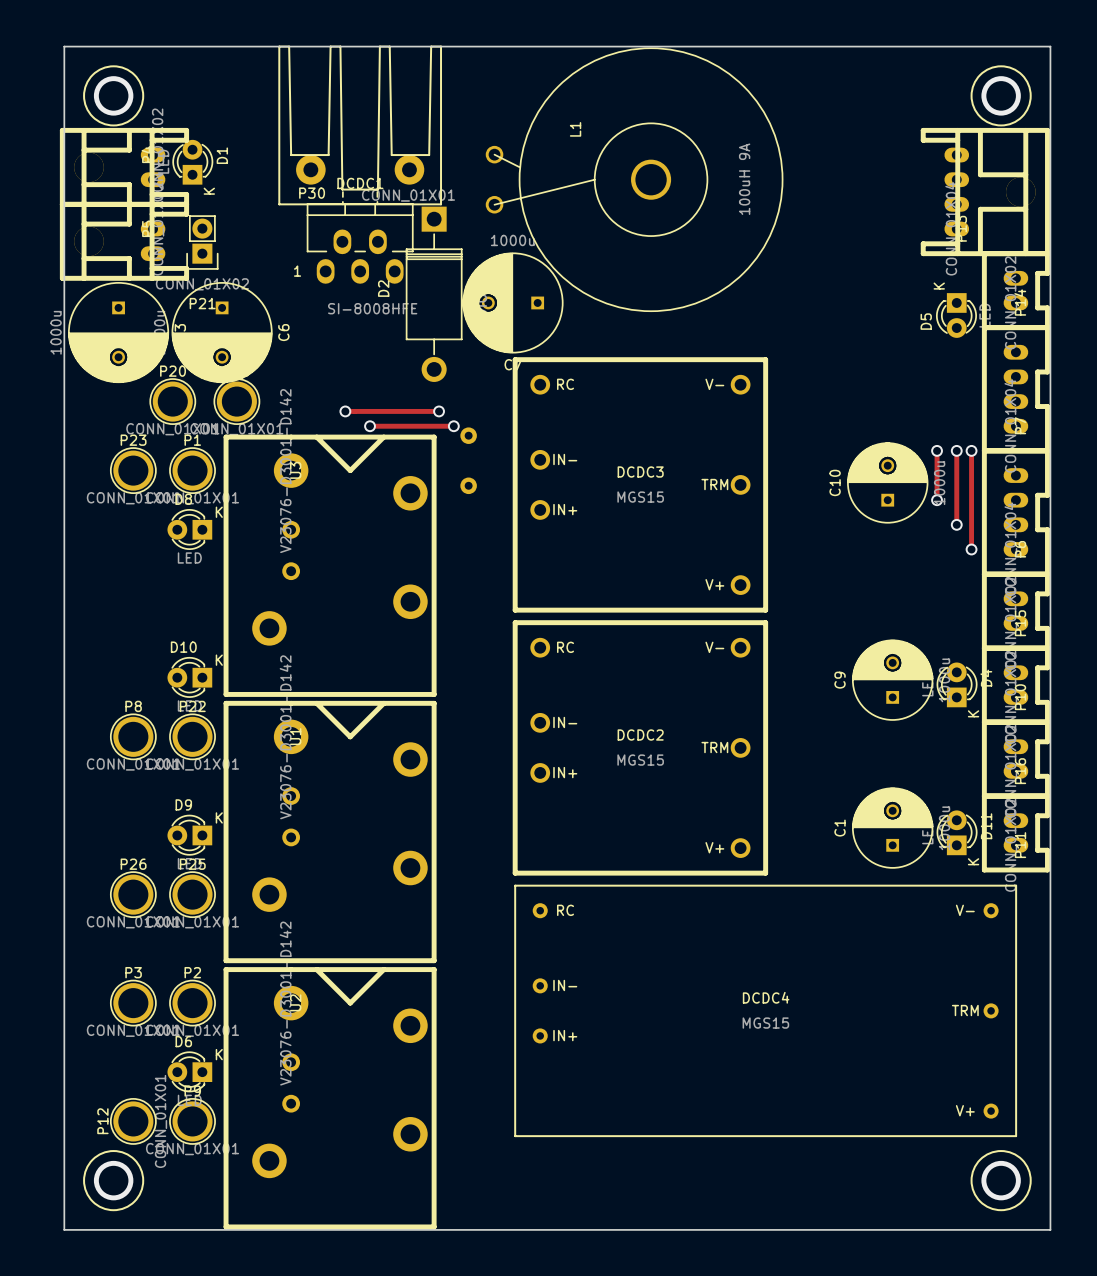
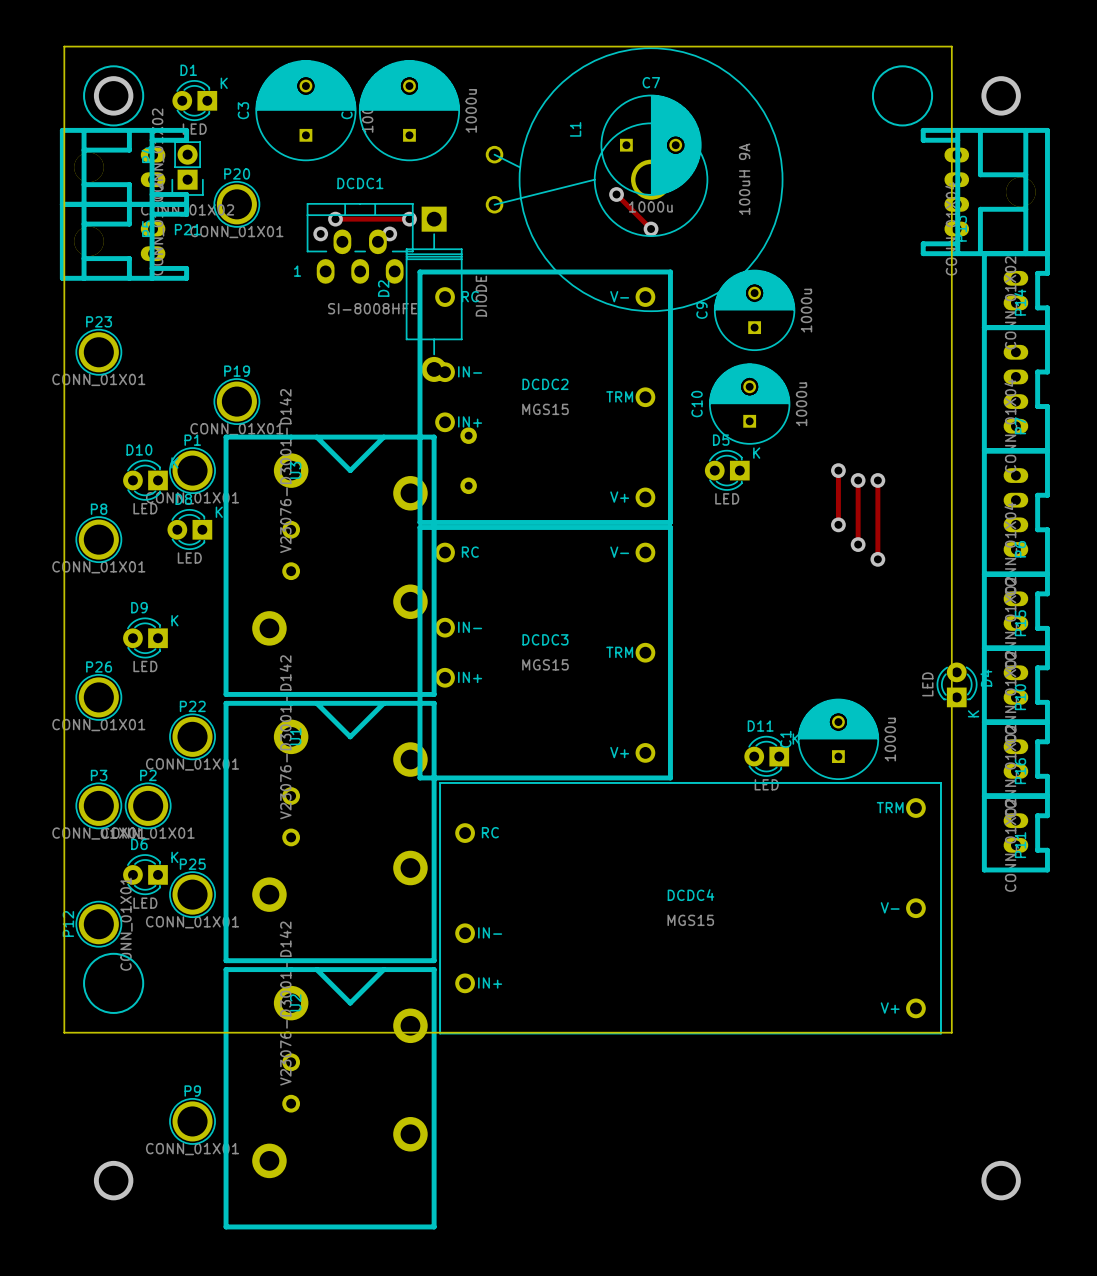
board edge: (951, 46) (1050, 46) (1050, 1229) (64, 1229) (64, 1032) -> (951, 46) (951, 1032) (64, 1032)
drawing position: (1001, 95) -> (902, 95)
P30: CONN_01X01 (360, 125) -> none
D1 rotation: 0° (192, 162) -> 90° counterclockwise (194, 100)
D1 position: (192, 162) -> (194, 100)
track: none -> (616, 194) (651, 229)
via: none -> (616, 194)
track: none -> (335, 219) (409, 219)
via: none -> (335, 219)
via: none -> (409, 219)
via: none -> (651, 229)
via: none -> (320, 233)
via: none -> (389, 233)
P21 position: (202, 242) -> (187, 168)
C7 rotation: 0° (513, 302) -> 180° (651, 145)
C7 position: (513, 302) -> (651, 145)
D5 rotation: 0° (956, 315) -> 90° clockwise (727, 470)
D5 position: (956, 315) -> (727, 470)
C3 rotation: 0° (118, 332) -> 180° (305, 110)
C3 position: (118, 332) -> (305, 110)
C6 rotation: 0° (222, 332) -> 180° (409, 110)
C6 position: (222, 332) -> (409, 110)
P20 position: (172, 401) -> (236, 204)
track: (345, 411) (439, 411) -> none
via: (345, 411) -> none
via: (439, 411) -> none
track: (370, 426) (453, 426) -> none
via: (370, 426) -> none
via: (453, 426) -> none
track: (937, 450) (937, 500) -> none
via: (937, 450) -> none
track: (956, 450) (956, 524) -> none
via: (956, 450) -> none
track: (971, 450) (971, 549) -> none
via: (971, 450) -> none
P23 position: (133, 470) -> (98, 352)
track: none -> (838, 470) (838, 524)
via: none -> (838, 470)
track: none -> (858, 480) (858, 544)
via: none -> (858, 480)
track: none -> (877, 480) (877, 559)
via: none -> (877, 480)
C10 position: (887, 482) -> (749, 404)
DCDC3 position: (640, 484) -> (545, 652)
via: (937, 500) -> none
via: none -> (838, 524)
via: (956, 524) -> none
via: none -> (858, 544)
via: (971, 549) -> none
via: none -> (877, 559)
D10 position: (189, 677) -> (145, 480)
C9 position: (892, 680) -> (754, 310)
P8 position: (133, 736) -> (98, 539)
DCDC2 position: (640, 747) -> (545, 397)
C1 position: (892, 828) -> (838, 739)
D11 rotation: 0° (957, 832) -> 90° counterclockwise (766, 756)
D11 position: (957, 832) -> (766, 756)
D9 position: (189, 835) -> (145, 637)
DCDC4 footprint: [514, 884, 1018, 1138] -> [439, 781, 942, 1035]
P26 position: (133, 894) -> (98, 697)
P3 position: (133, 1003) -> (98, 805)
P2 position: (192, 1003) -> (148, 805)
D6 position: (189, 1071) -> (145, 874)
P12 position: (133, 1121) -> (98, 924)
drawing: [970, 1150, 1032, 1212] -> none
drawing position: (113, 1180) -> (113, 983)

